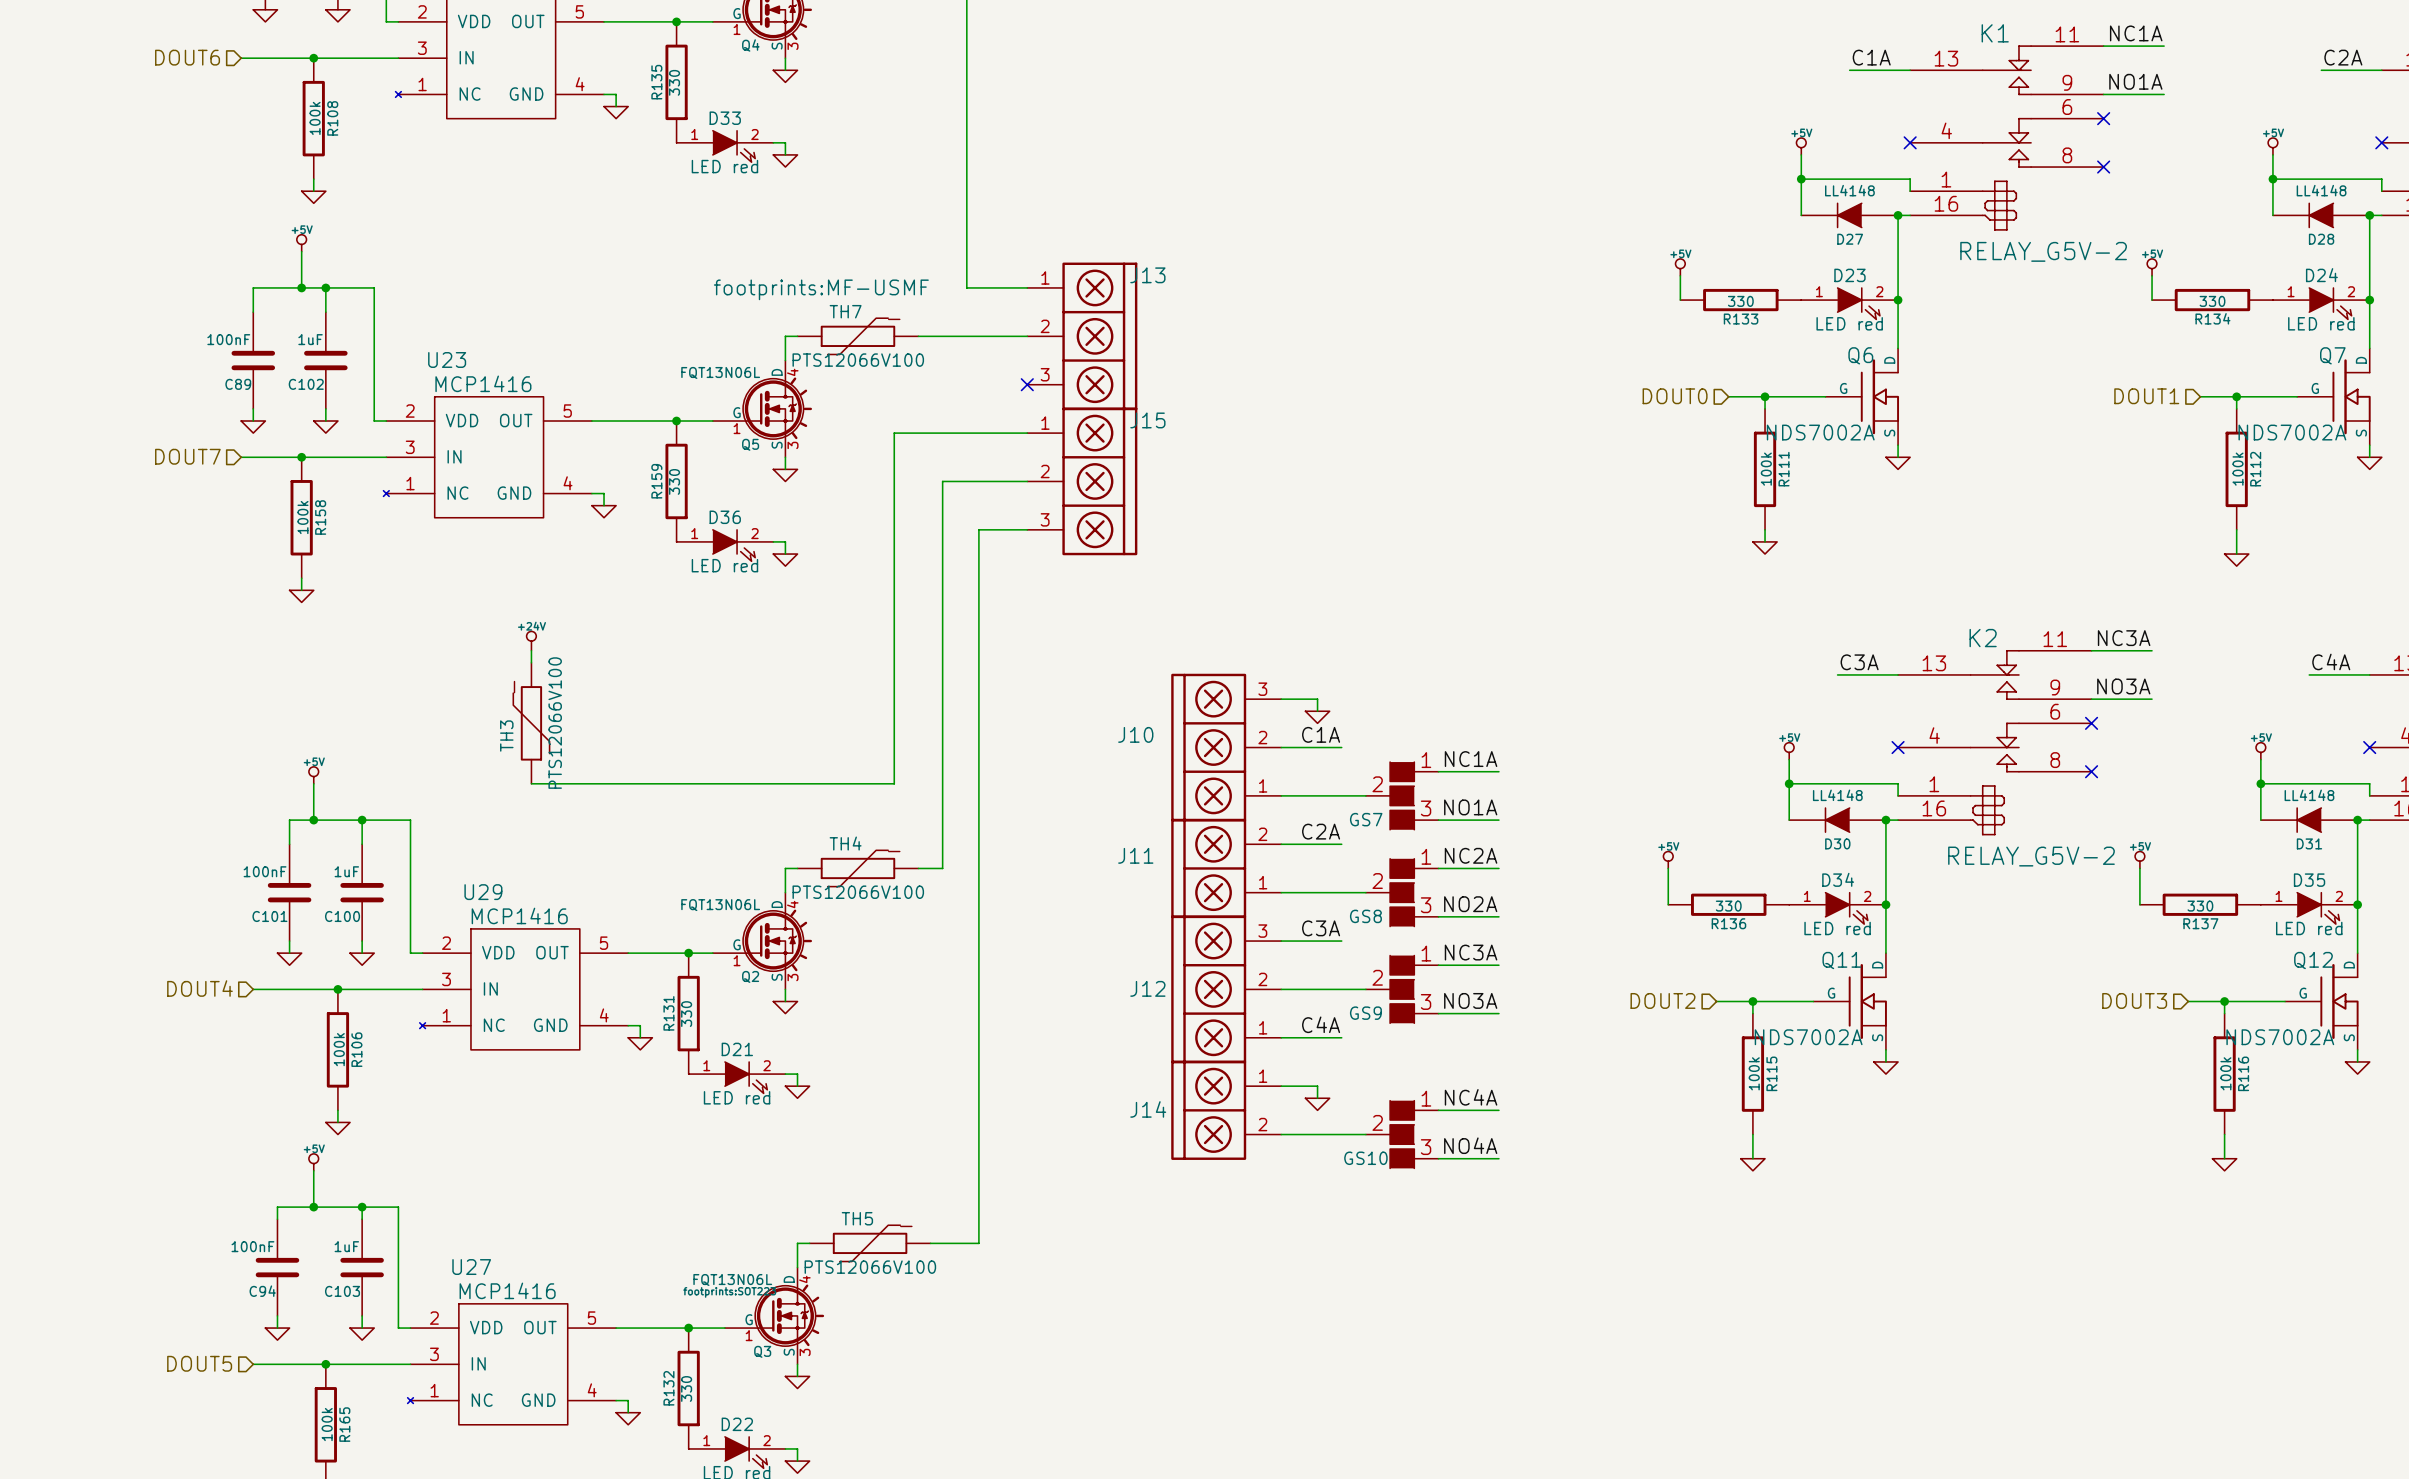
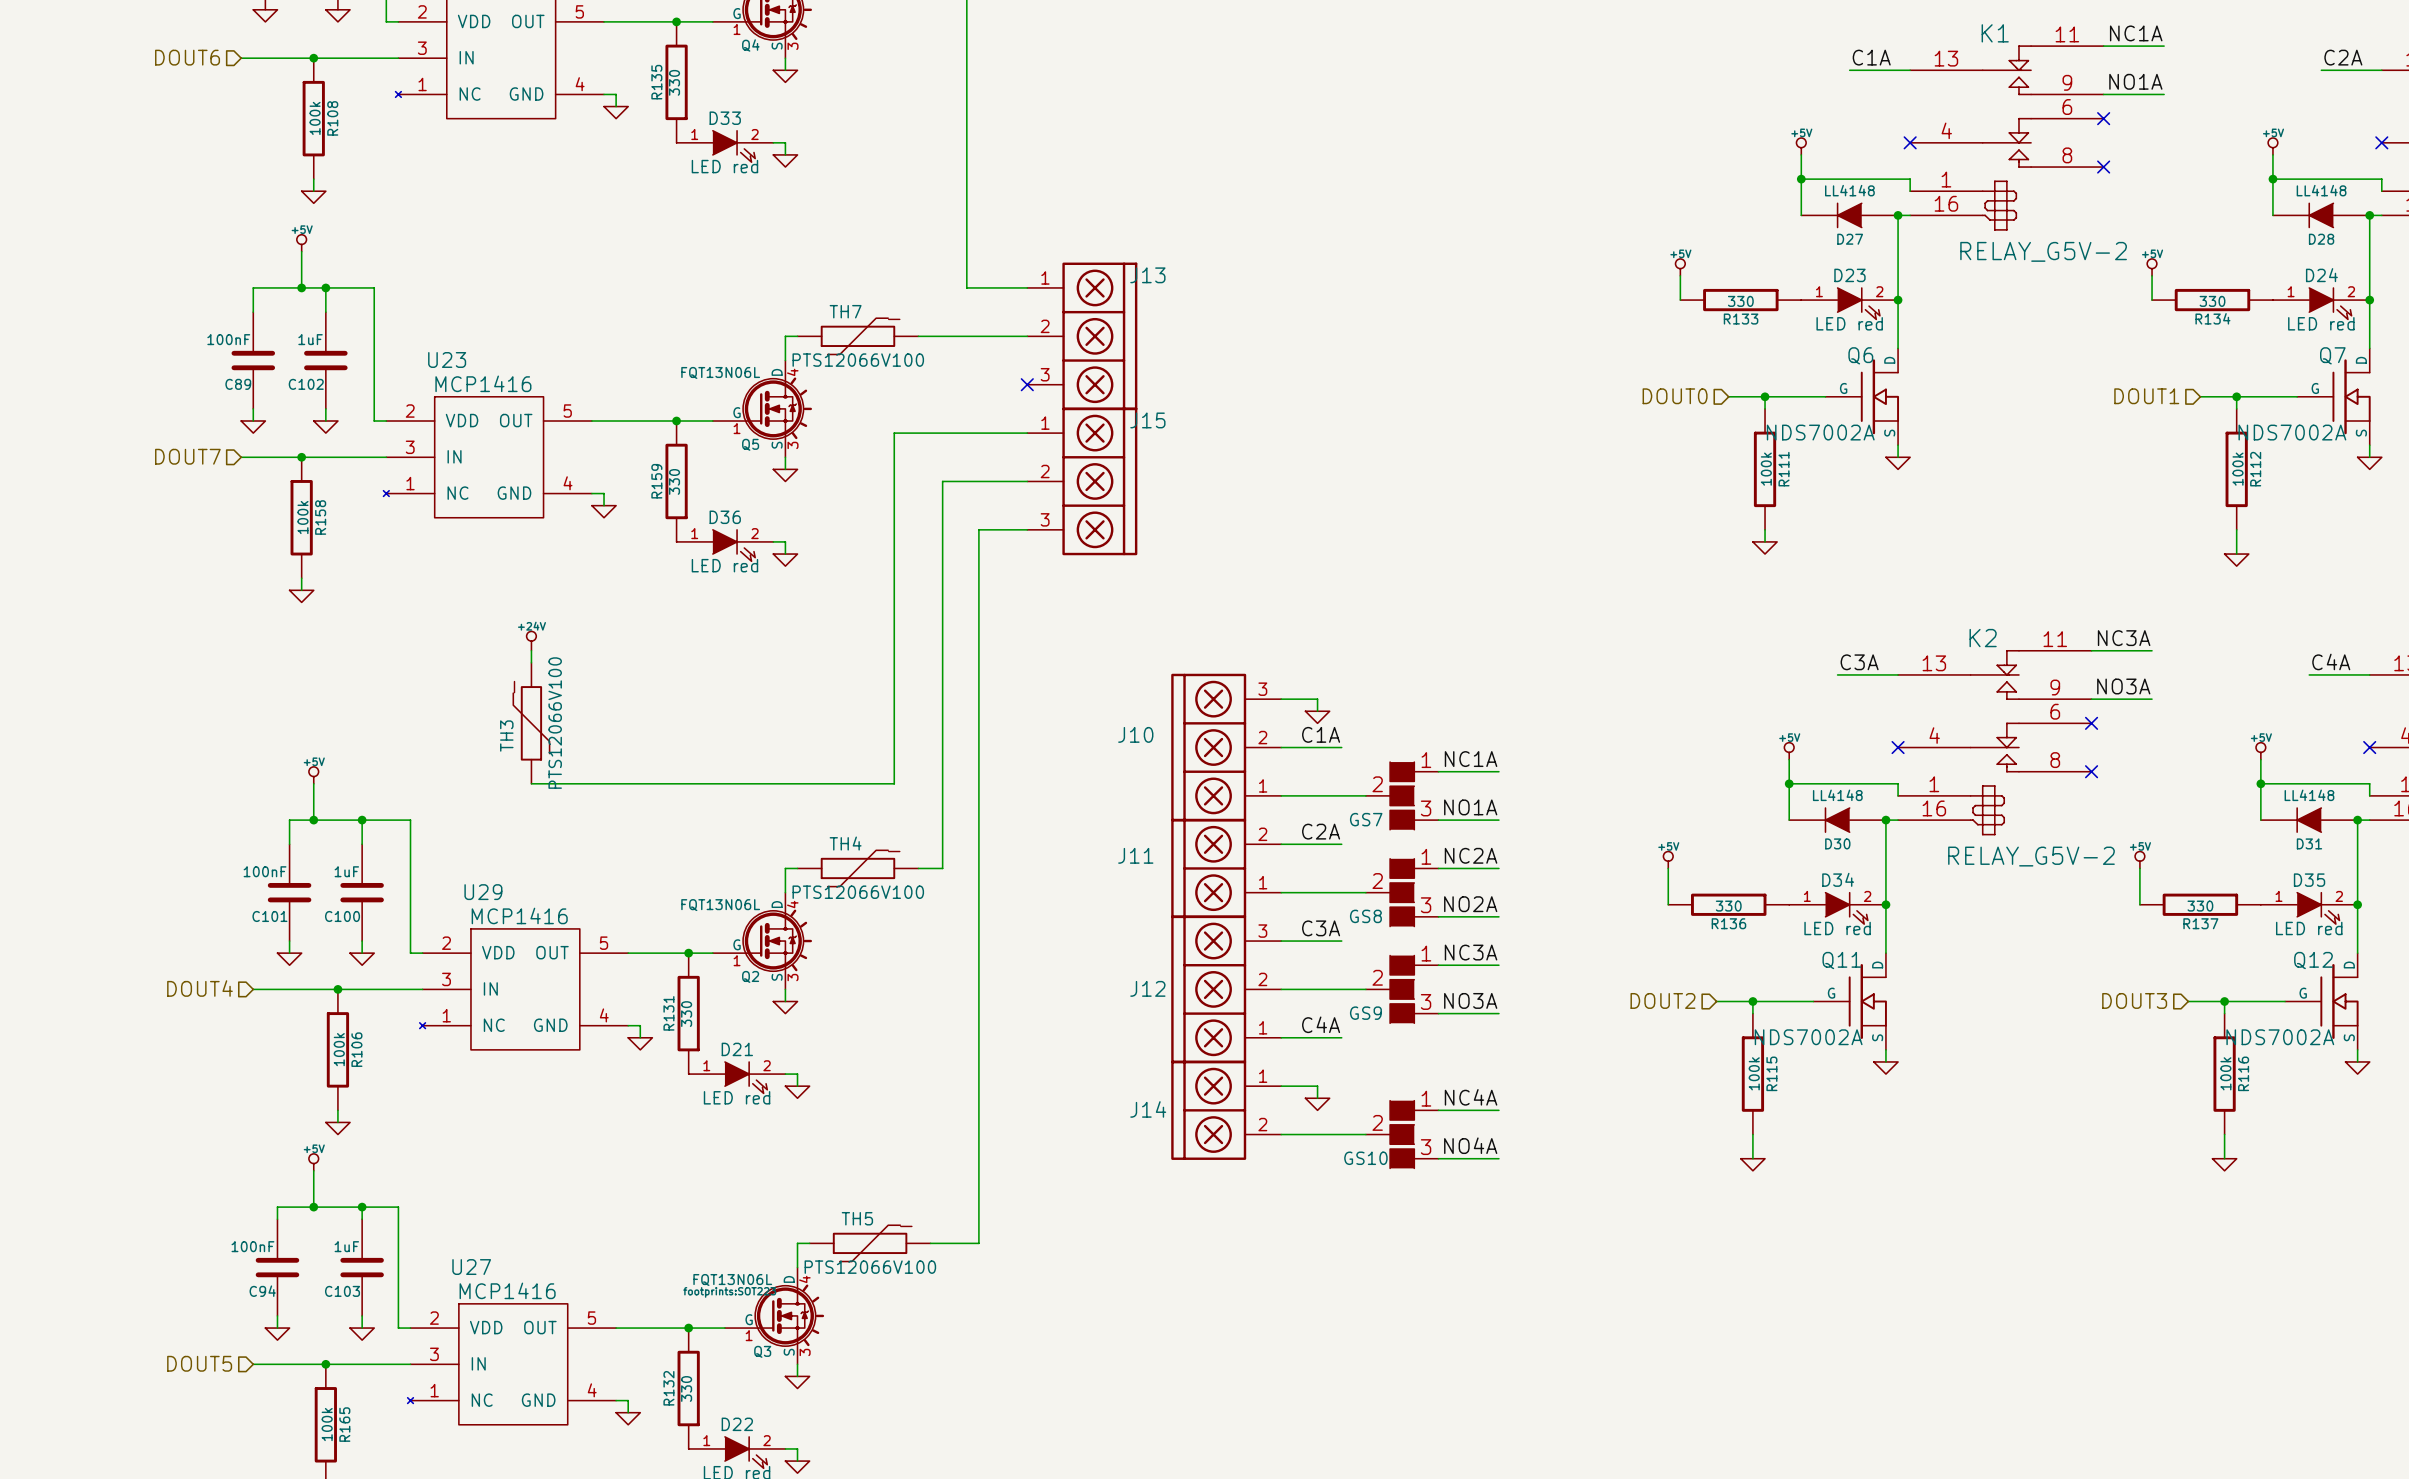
TH7 text: footprints:MF-USMF (821, 289) -> none

